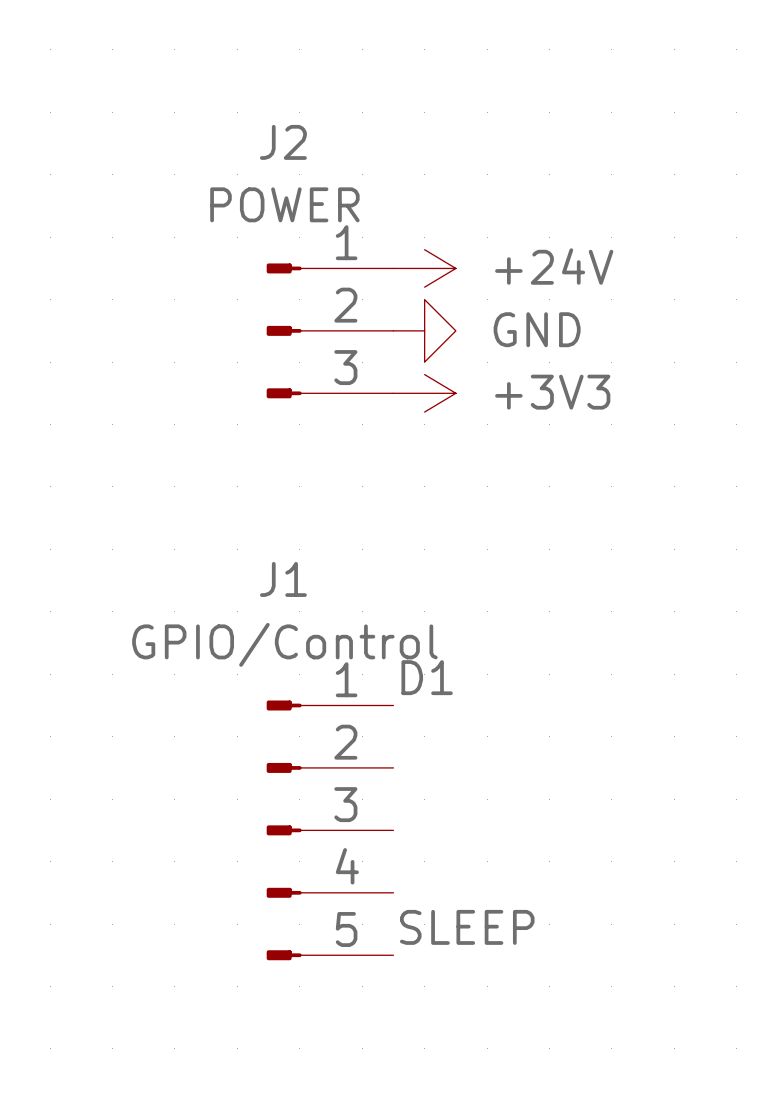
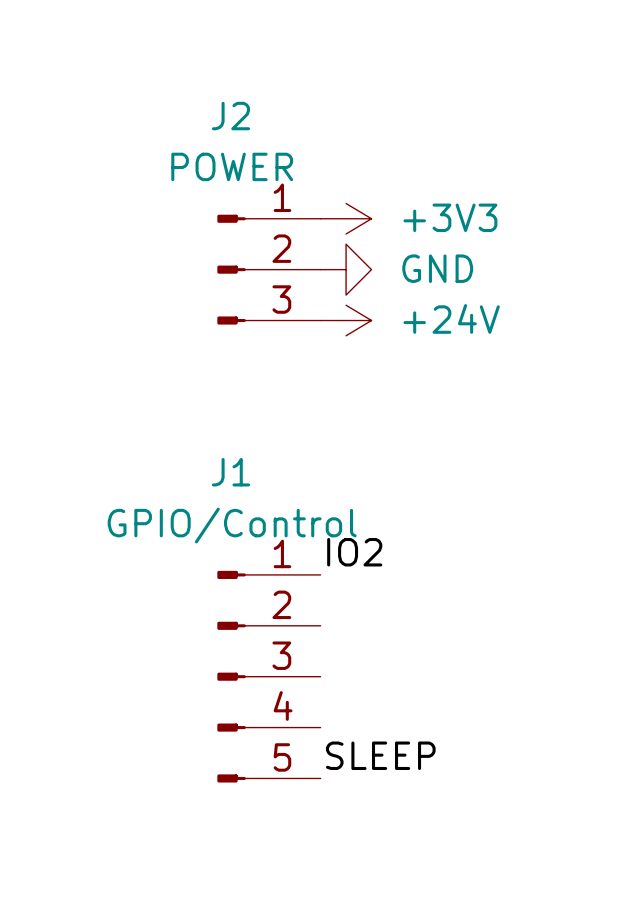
power symbol: +24V (424, 268) -> +3V3 (346, 218)
power symbol: +3V3 (424, 393) -> +24V (346, 320)
label: D1 (427, 677) -> IO2 (354, 552)

